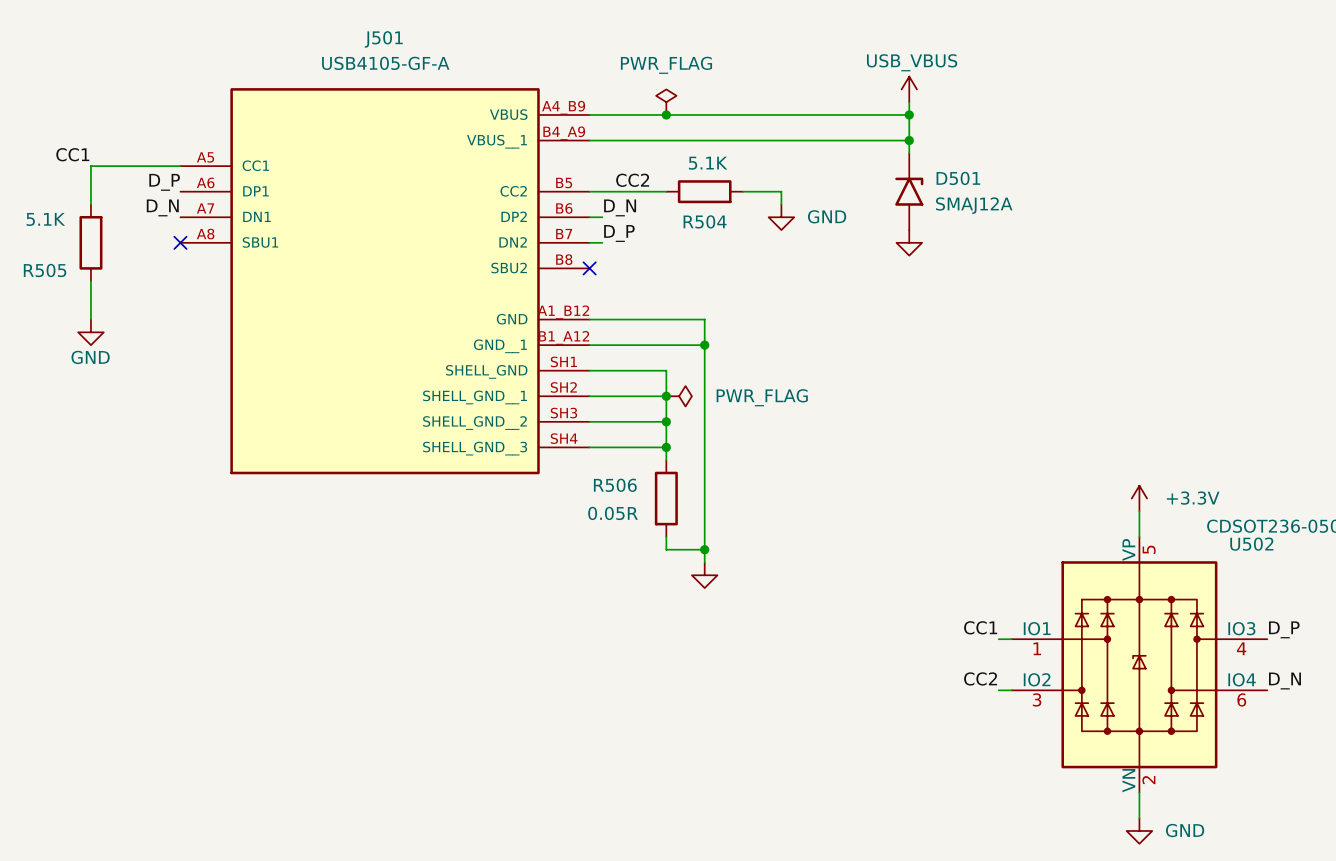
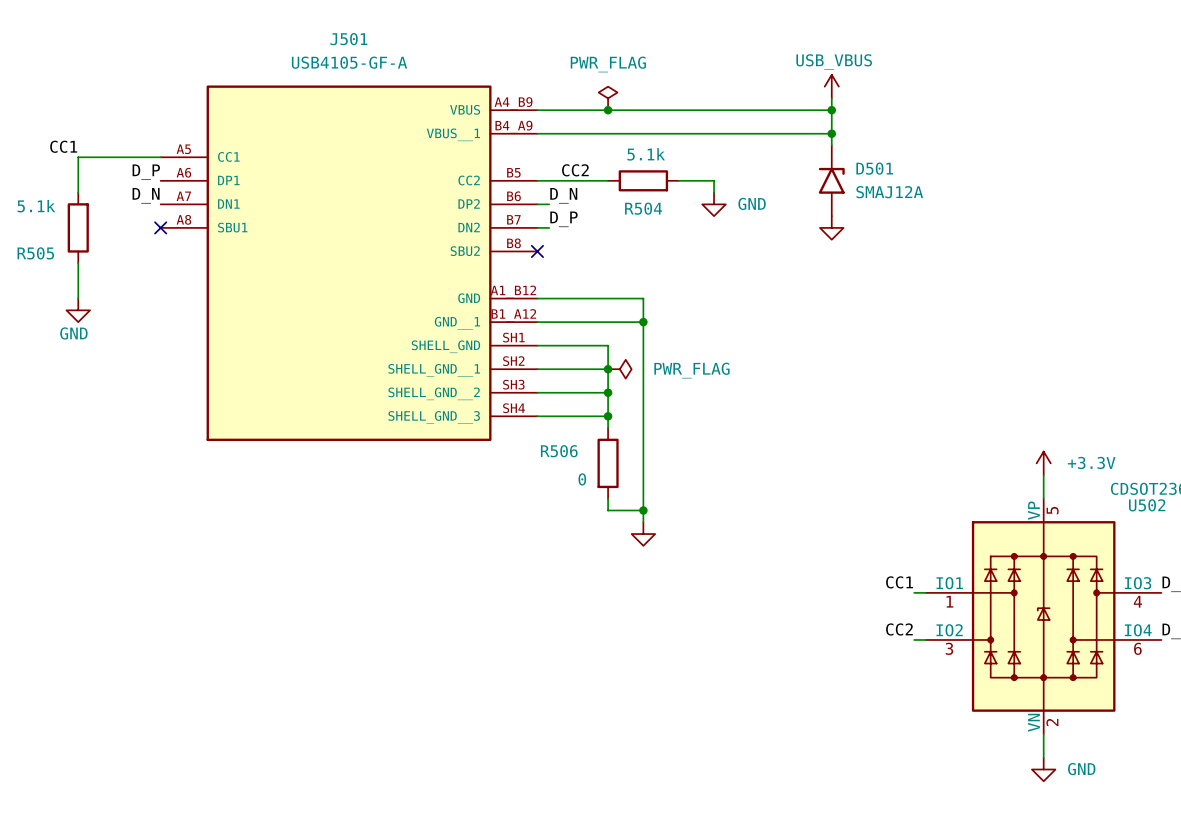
R504 value: 5.1K (708, 163) -> 5.1k (646, 154)
R505 value: 5.1K (45, 219) -> 5.1k (36, 206)
R506 value: 0.05R (613, 513) -> 0 (582, 479)

